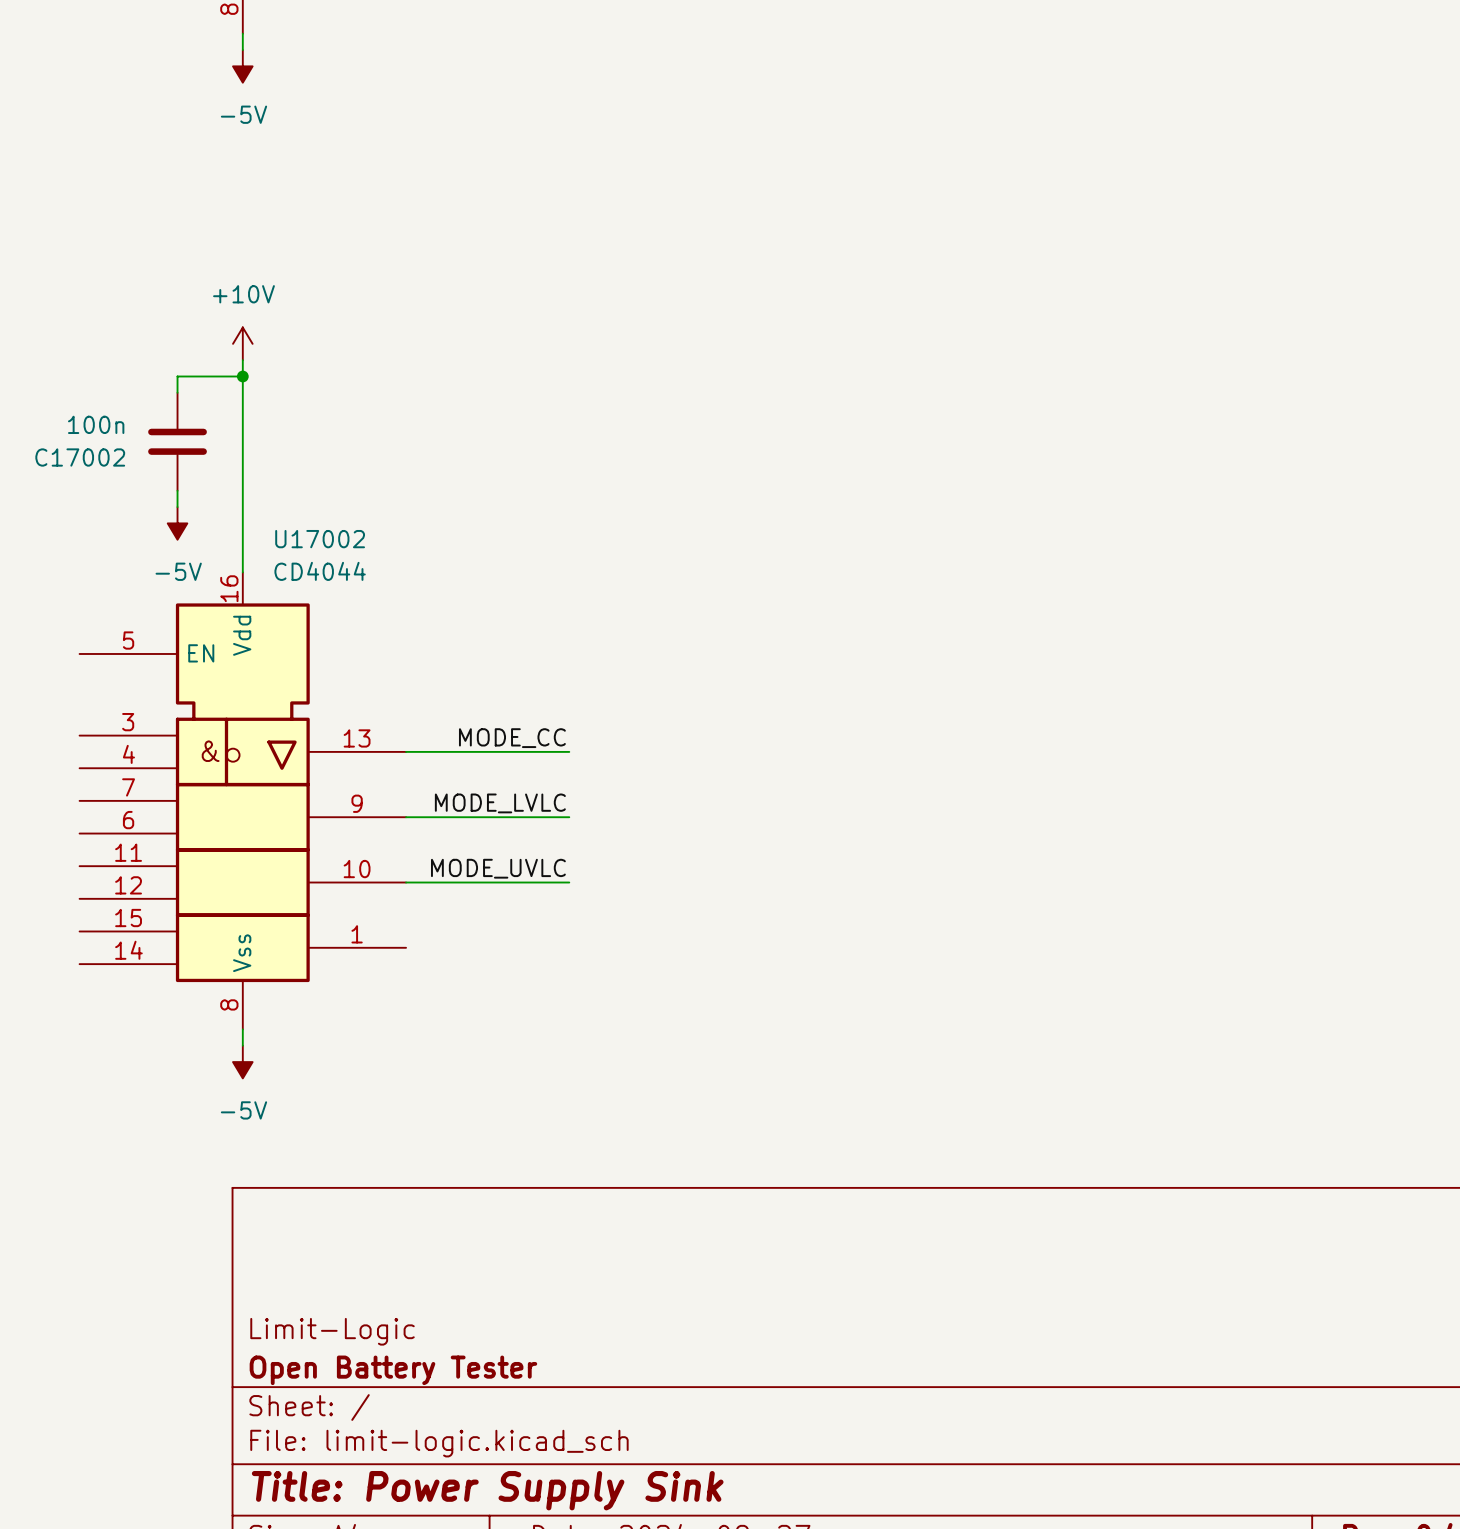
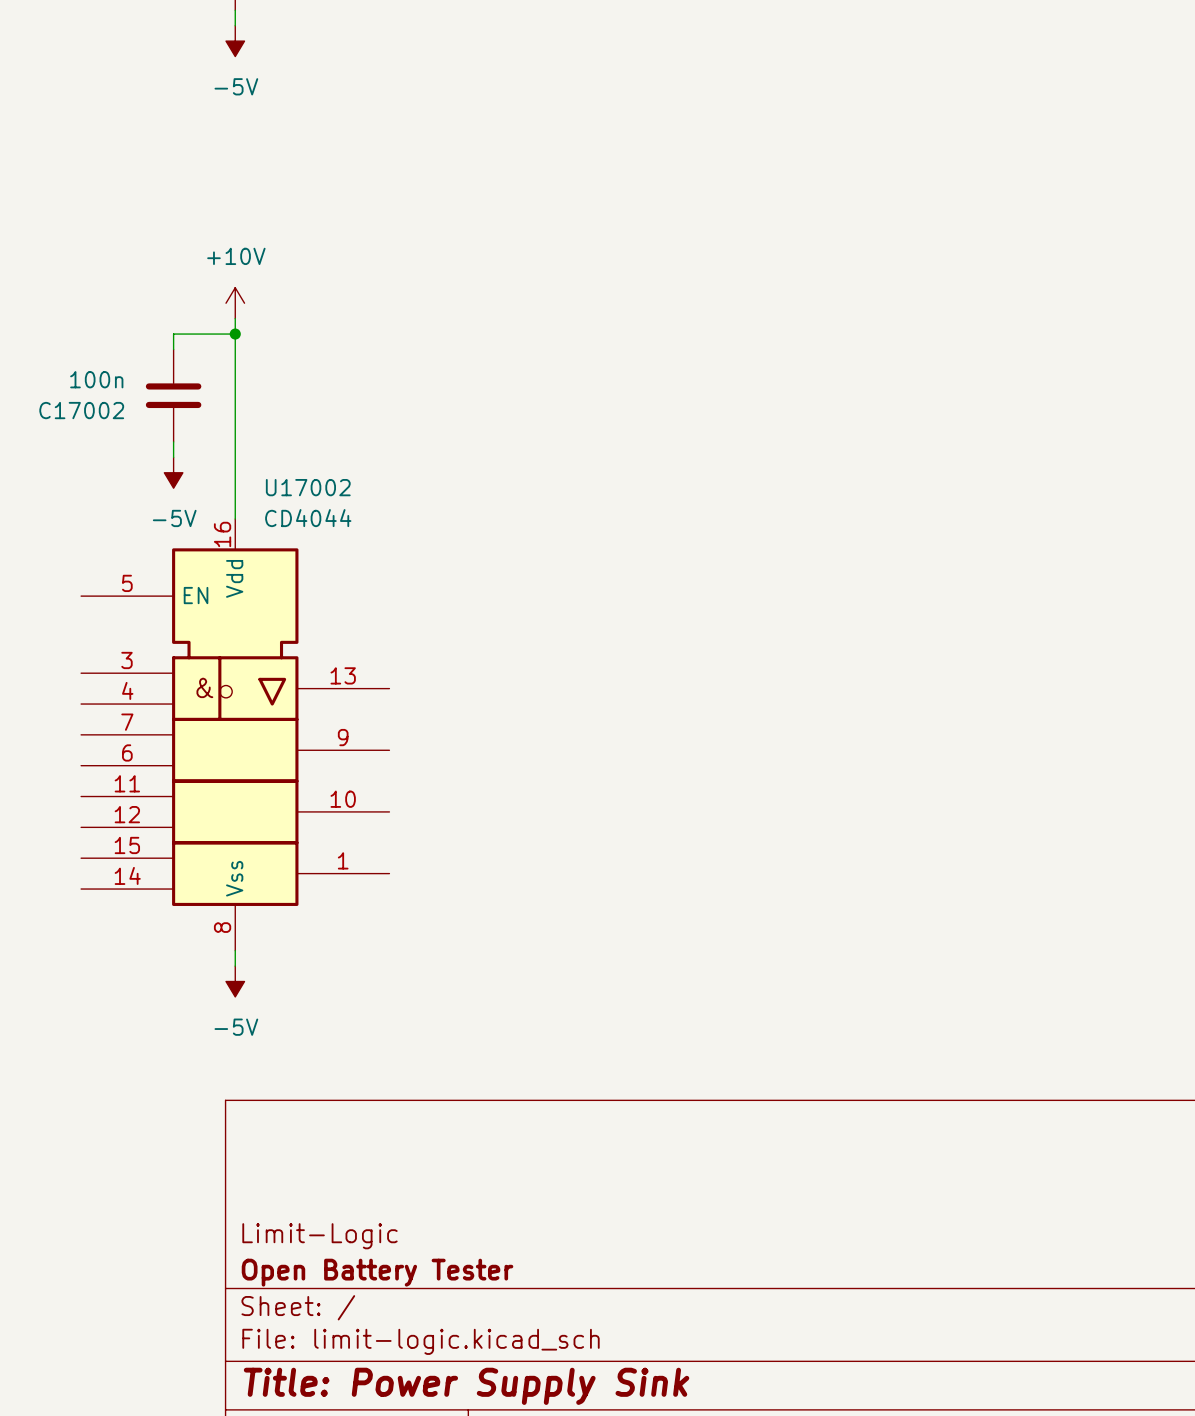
label: MODE_CC (512, 738) -> none
wire: (406, 751) (569, 751) -> none
label: MODE_LVLC (500, 803) -> none
wire: (406, 817) (569, 817) -> none
label: MODE_UVLC (498, 868) -> none
wire: (406, 882) (569, 882) -> none

